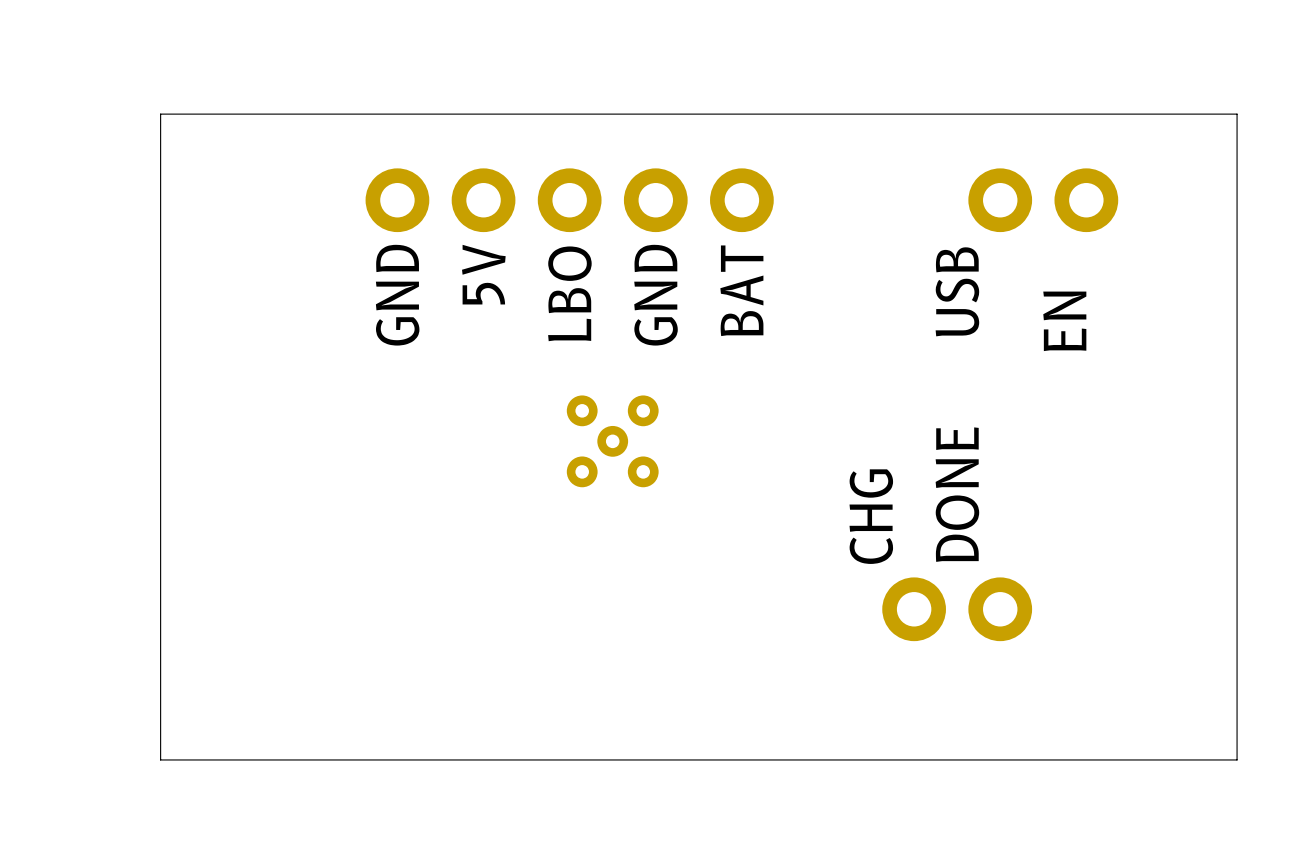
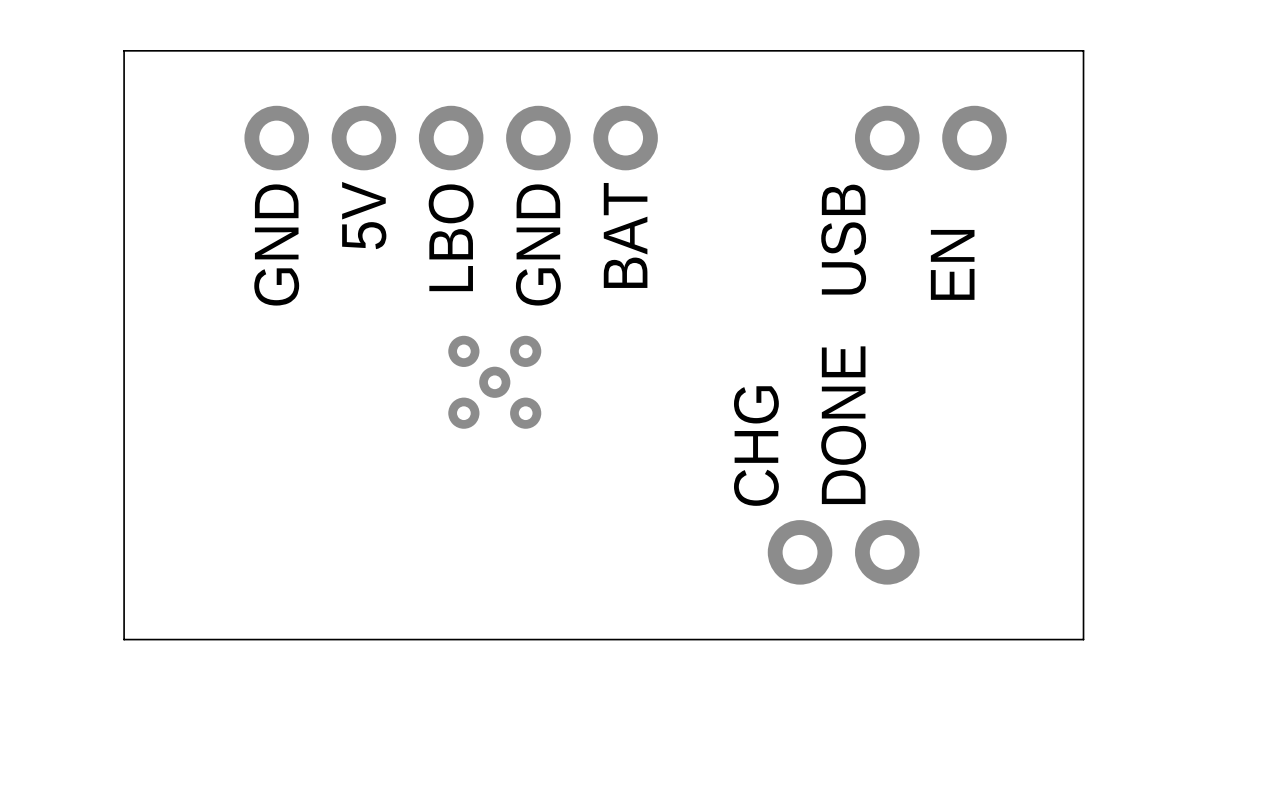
board edge: (1193, 114) (1237, 114) (1237, 759) (160, 759) (160, 114) (246, 114) -> (1083, 50) (1083, 639) (124, 639) (124, 50)

